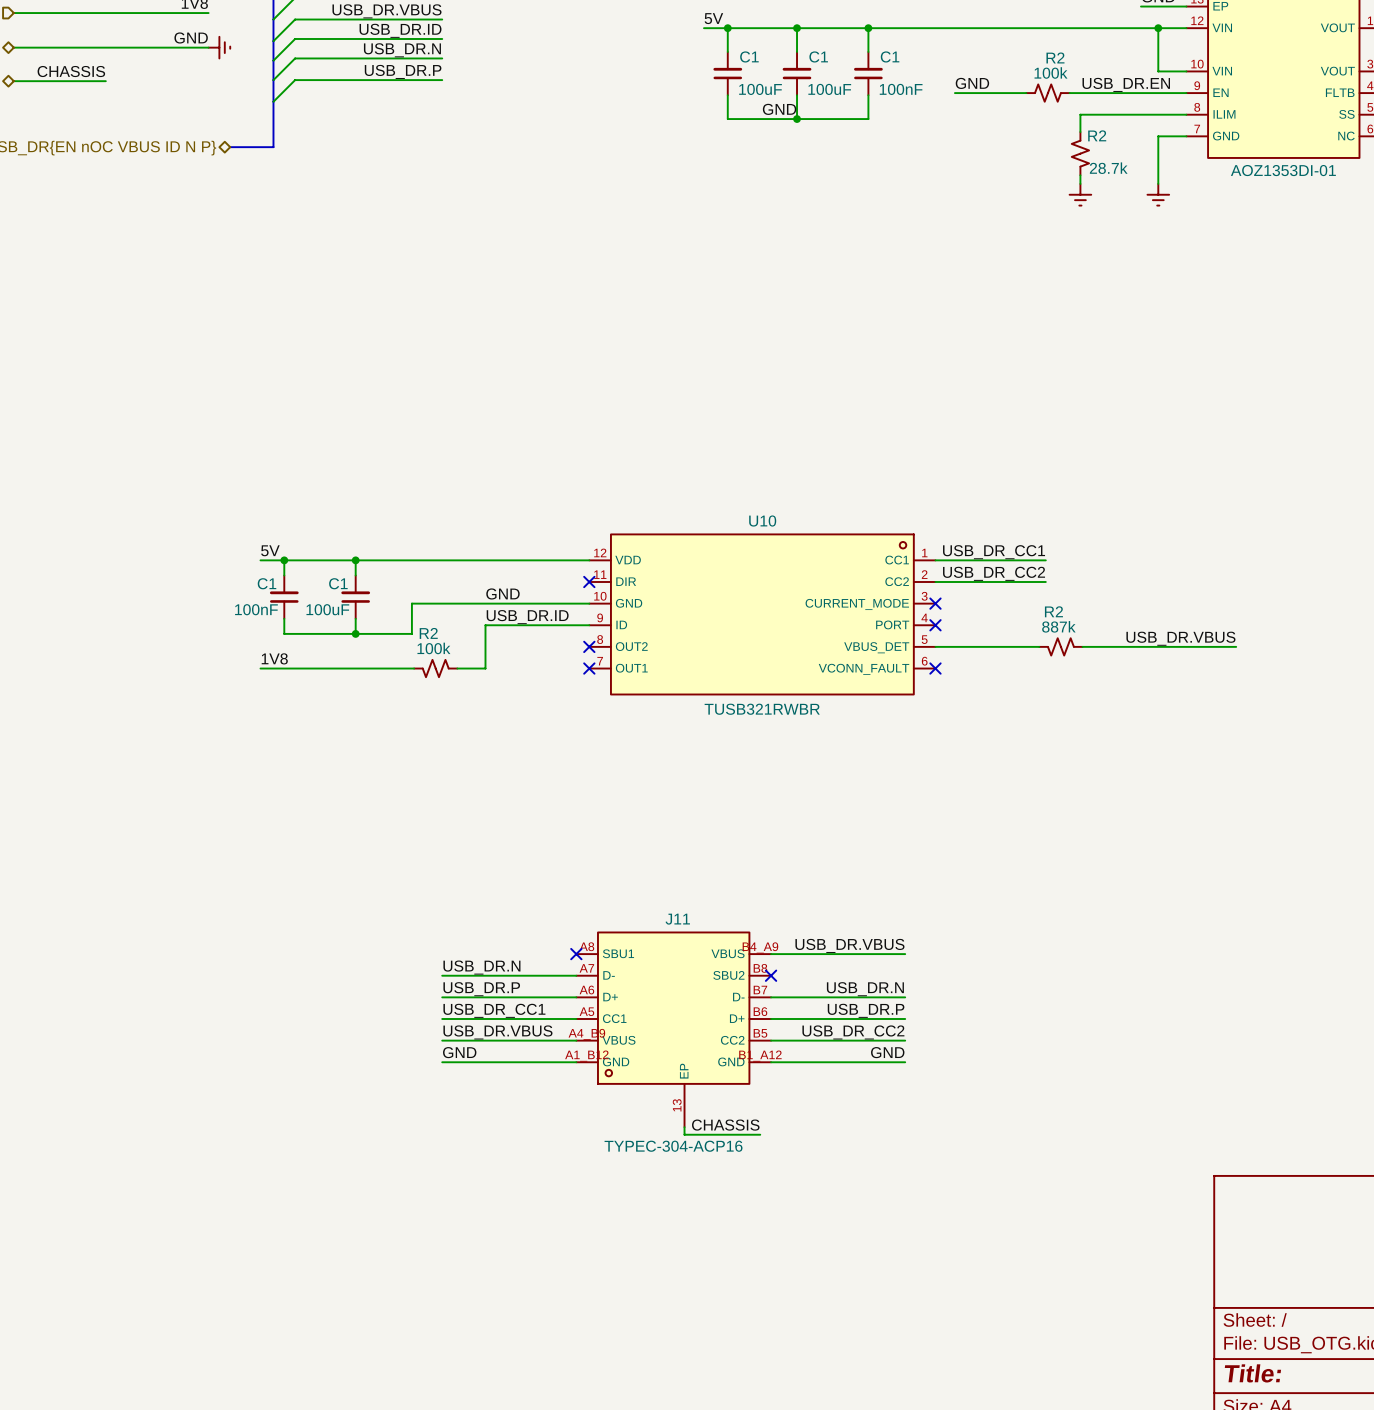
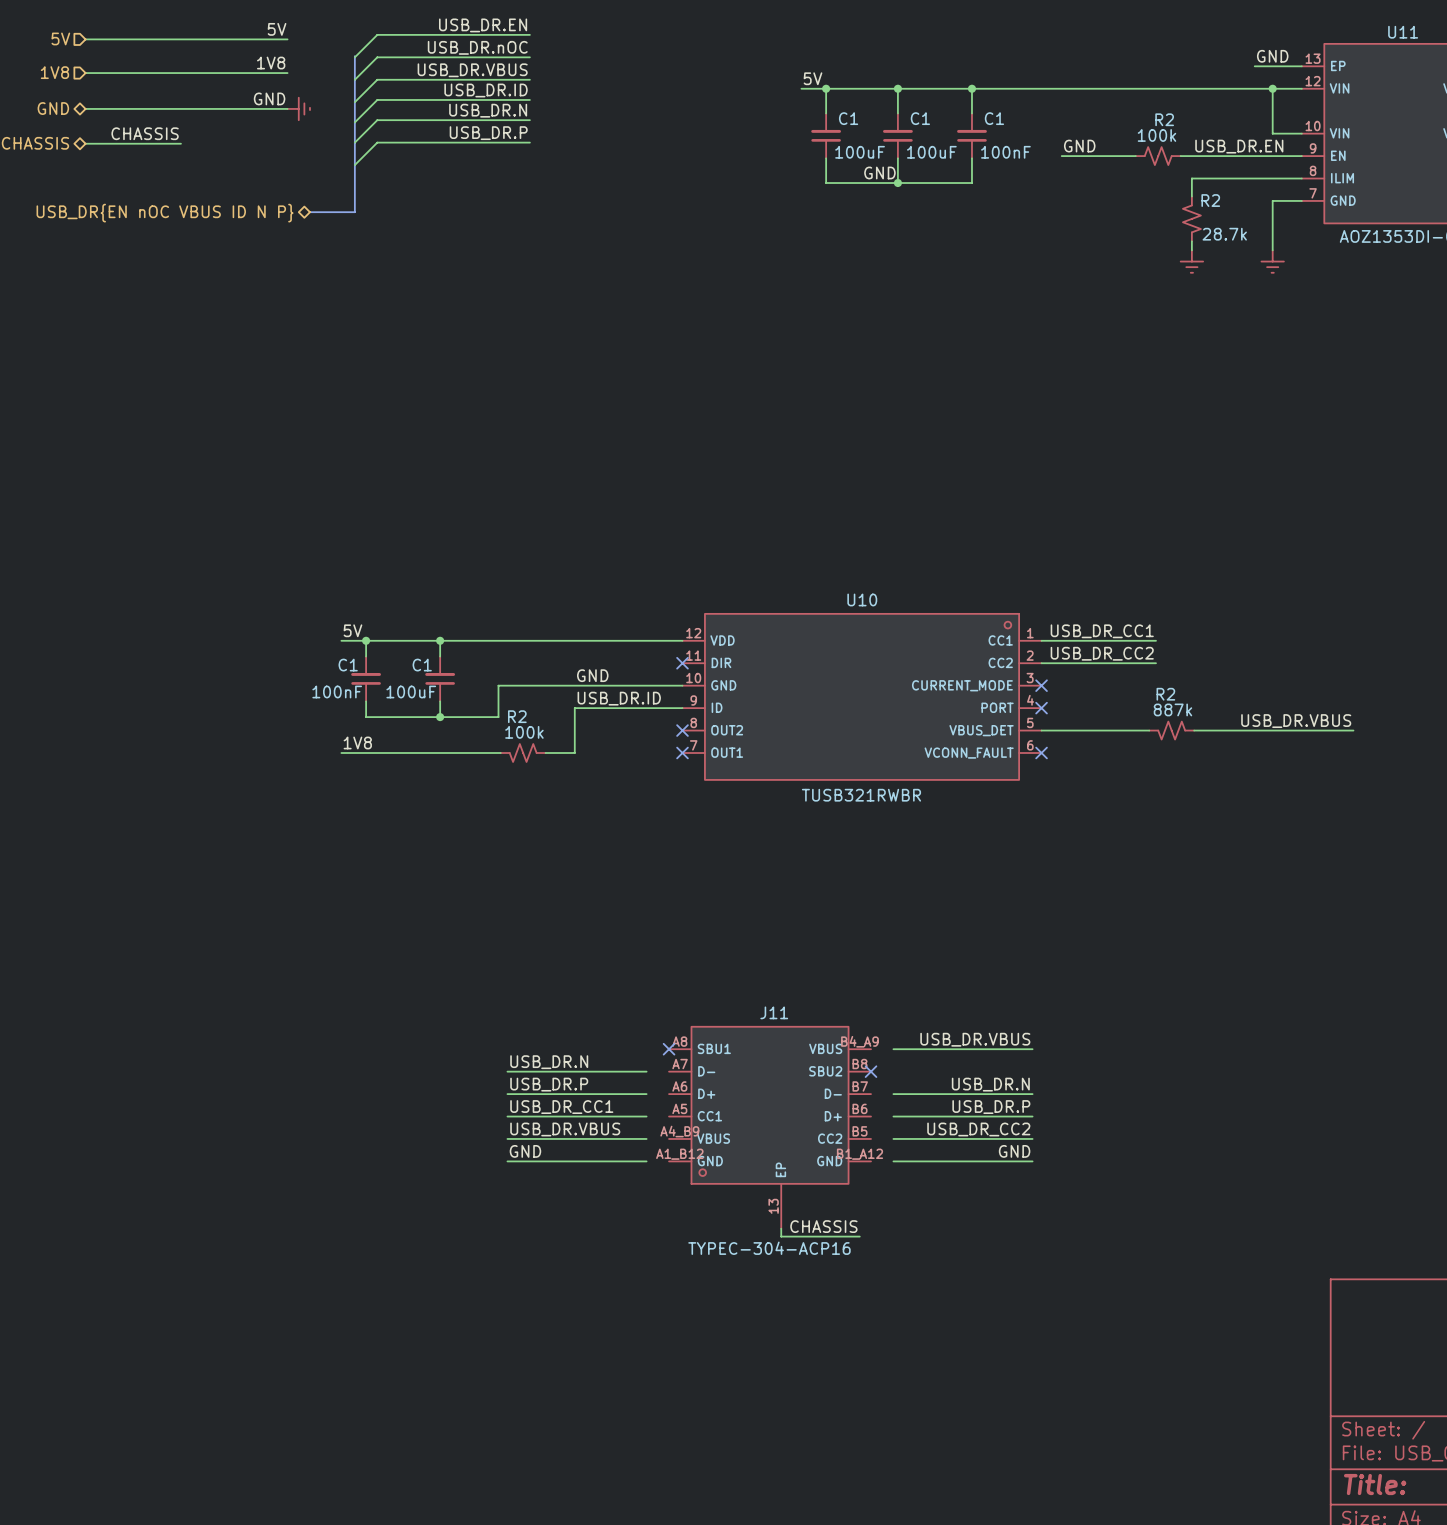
label position: USB_DR.VBUS (849, 945) -> USB_DR.VBUS (975, 1039)
wire: (771, 954) (792, 954) -> (1010, 1049) (1032, 1049)
label position: USB_DR.N (481, 967) -> USB_DR.N (549, 1062)
wire: (554, 975) (576, 975) -> (507, 1071) (529, 1071)
label position: USB_DR.P (481, 989) -> USB_DR.P (549, 1084)
label position: USB_DR.N (865, 989) -> USB_DR.N (990, 1084)
wire: (554, 997) (576, 997) -> (507, 1094) (529, 1094)
wire: (771, 997) (792, 997) -> (1010, 1094) (1032, 1094)
label position: USB_DR_CC1 (494, 1010) -> USB_DR_CC1 (561, 1107)
label position: USB_DR.P (866, 1010) -> USB_DR.P (991, 1107)
wire: (554, 1018) (576, 1018) -> (507, 1116) (529, 1116)
wire: (771, 1018) (792, 1018) -> (1010, 1116) (1032, 1116)
label position: USB_DR.VBUS (497, 1032) -> USB_DR.VBUS (565, 1129)
label position: USB_DR_CC2 (853, 1032) -> USB_DR_CC2 (978, 1129)
wire: (554, 1040) (576, 1040) -> (507, 1138) (529, 1138)
wire: (771, 1040) (792, 1040) -> (1010, 1138) (1032, 1138)
label position: GND (459, 1052) -> GND (525, 1151)
label position: GND (887, 1052) -> GND (1014, 1151)
wire: (554, 1062) (576, 1062) -> (507, 1161) (529, 1161)
wire: (771, 1062) (792, 1062) -> (1010, 1161) (1032, 1161)

